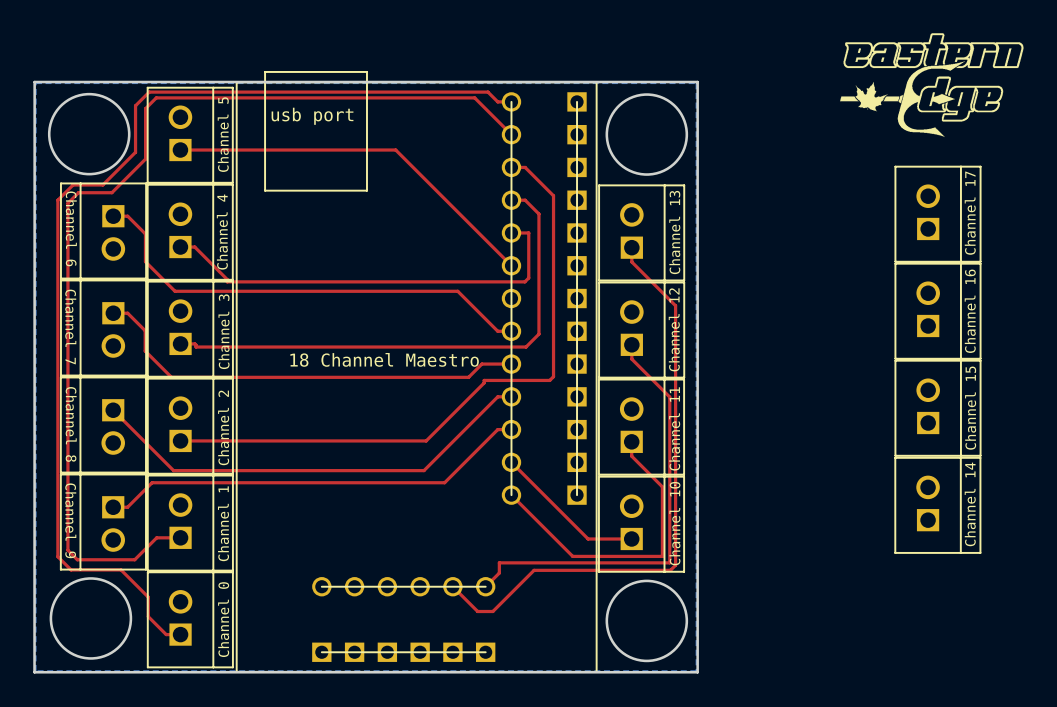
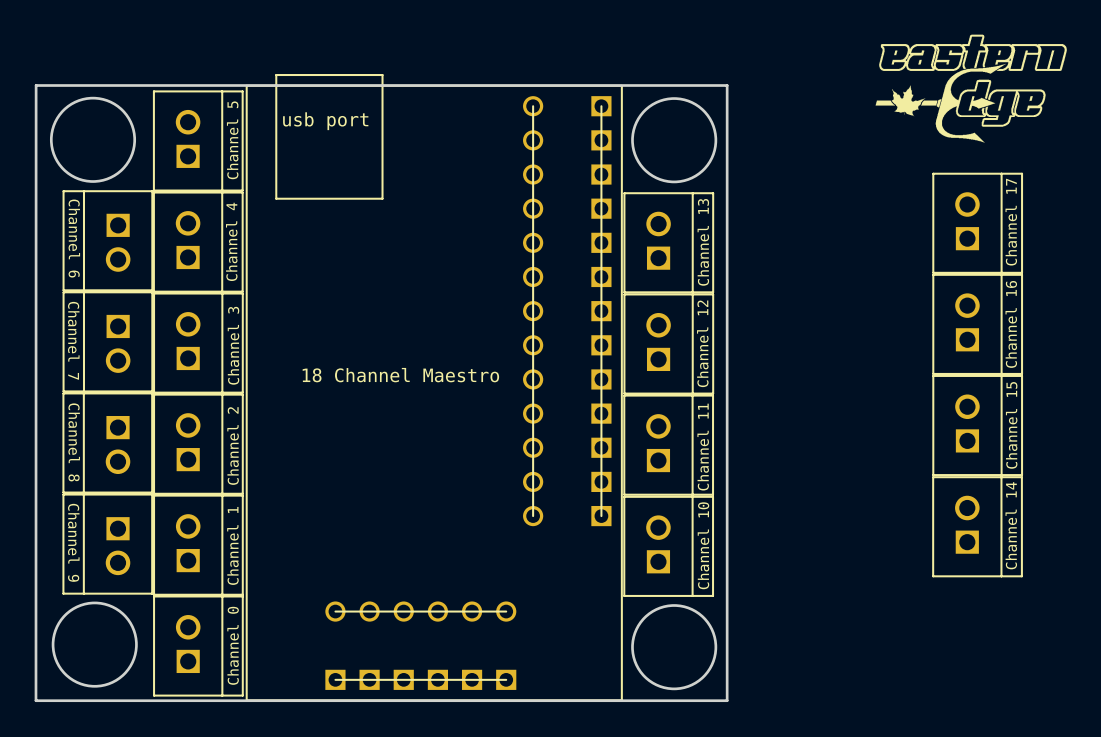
bottom zone outline: (35, 83) (696, 83) (696, 670) (35, 670) (35, 83) -> none
top track: (511, 101) (497, 101) (487, 92) (149, 92) (135, 105) (135, 152) (102, 184) (73, 184) (57, 200) (57, 556) (71, 569) (121, 569) (148, 597) (148, 616) (166, 634) (180, 634) -> none
top track: (511, 134) (474, 97) (156, 97) (145, 108) (145, 159) (111, 192) (78, 192) (67, 203) (67, 550) (77, 559) (134, 559) (156, 537) (180, 537) -> none
top track: (180, 150) (395, 150) (511, 265) -> none
top track: (511, 167) (525, 167) (553, 195) (553, 376) (549, 380) (484, 380) (484, 382) (426, 440) (180, 440) -> none
top track: (511, 200) (525, 200) (538, 214) (538, 334) (526, 347) (196, 347) (194, 343) (180, 343) -> none
top track: (113, 216) (127, 216) (145, 233) (145, 261) (175, 291) (457, 291) (497, 331) (511, 331) -> none
top track: (511, 232) (528, 233) (528, 278) (524, 281) (227, 281) (227, 279) (194, 247) (180, 247) -> none
top track: (631, 247) (631, 262) (675, 305) (675, 565) (670, 570) (534, 570) (492, 611) (477, 611) (452, 586) -> none
top track: (113, 313) (127, 313) (145, 330) (145, 351) (171, 377) (468, 377) (481, 364) (511, 364) -> none
top track: (631, 344) (631, 359) (669, 397) (669, 562) (499, 562) (499, 573) (485, 586) -> none
top track: (511, 396) (497, 396) (424, 470) (173, 470) (113, 410) -> none
top track: (511, 429) (497, 429) (444, 482) (152, 482) (127, 507) (113, 507) -> none
top track: (631, 441) (631, 456) (662, 486) (662, 556) -> none
top track: (511, 462) (588, 538) (631, 538) -> none
top track: (511, 495) (572, 556) (662, 556) -> none

